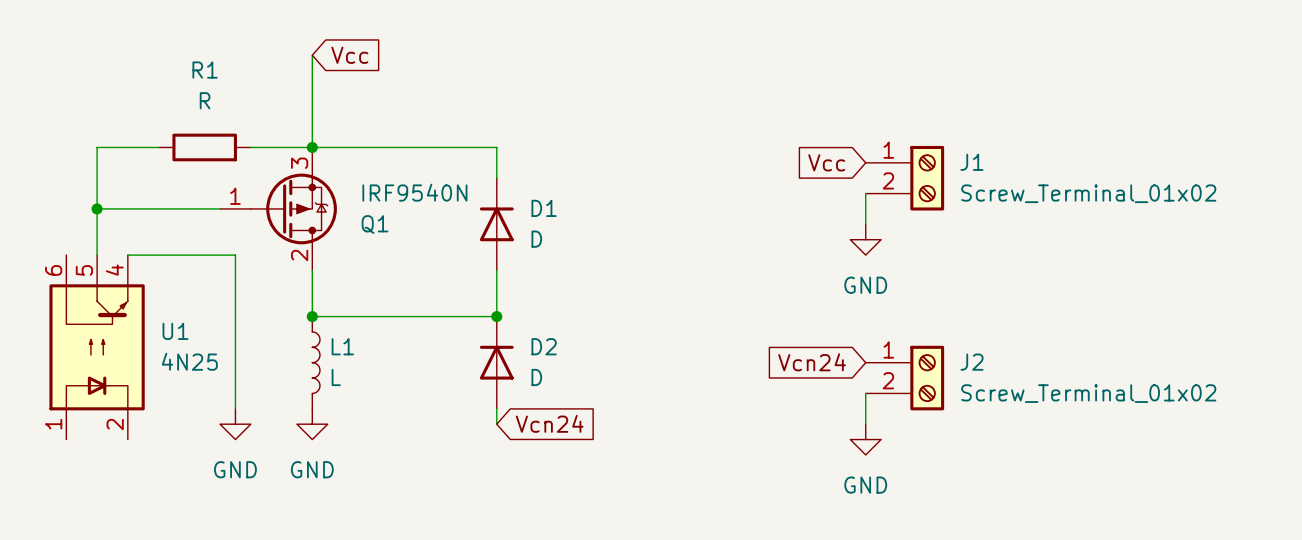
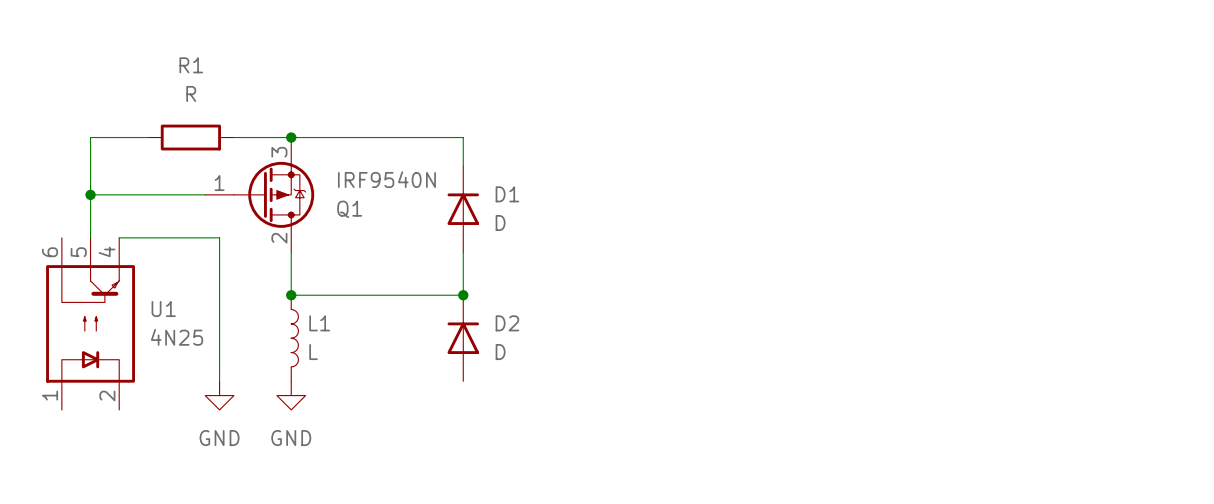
wire: (312, 55) (312, 147) -> none
global label: Vcc (349, 55) -> none
global label: Vcc (826, 162) -> none
J1: Screw_Terminal_01x02 (904, 178) -> none
wire: (865, 193) (865, 224) -> none
power symbol: GND (865, 239) -> none
global label: Vcn24 (812, 362) -> none
J2: Screw_Terminal_01x02 (904, 378) -> none
wire: (865, 393) (865, 424) -> none
wire: (496, 408) (496, 424) -> none
global label: Vcn24 (549, 423) -> none
power symbol: GND (865, 439) -> none

